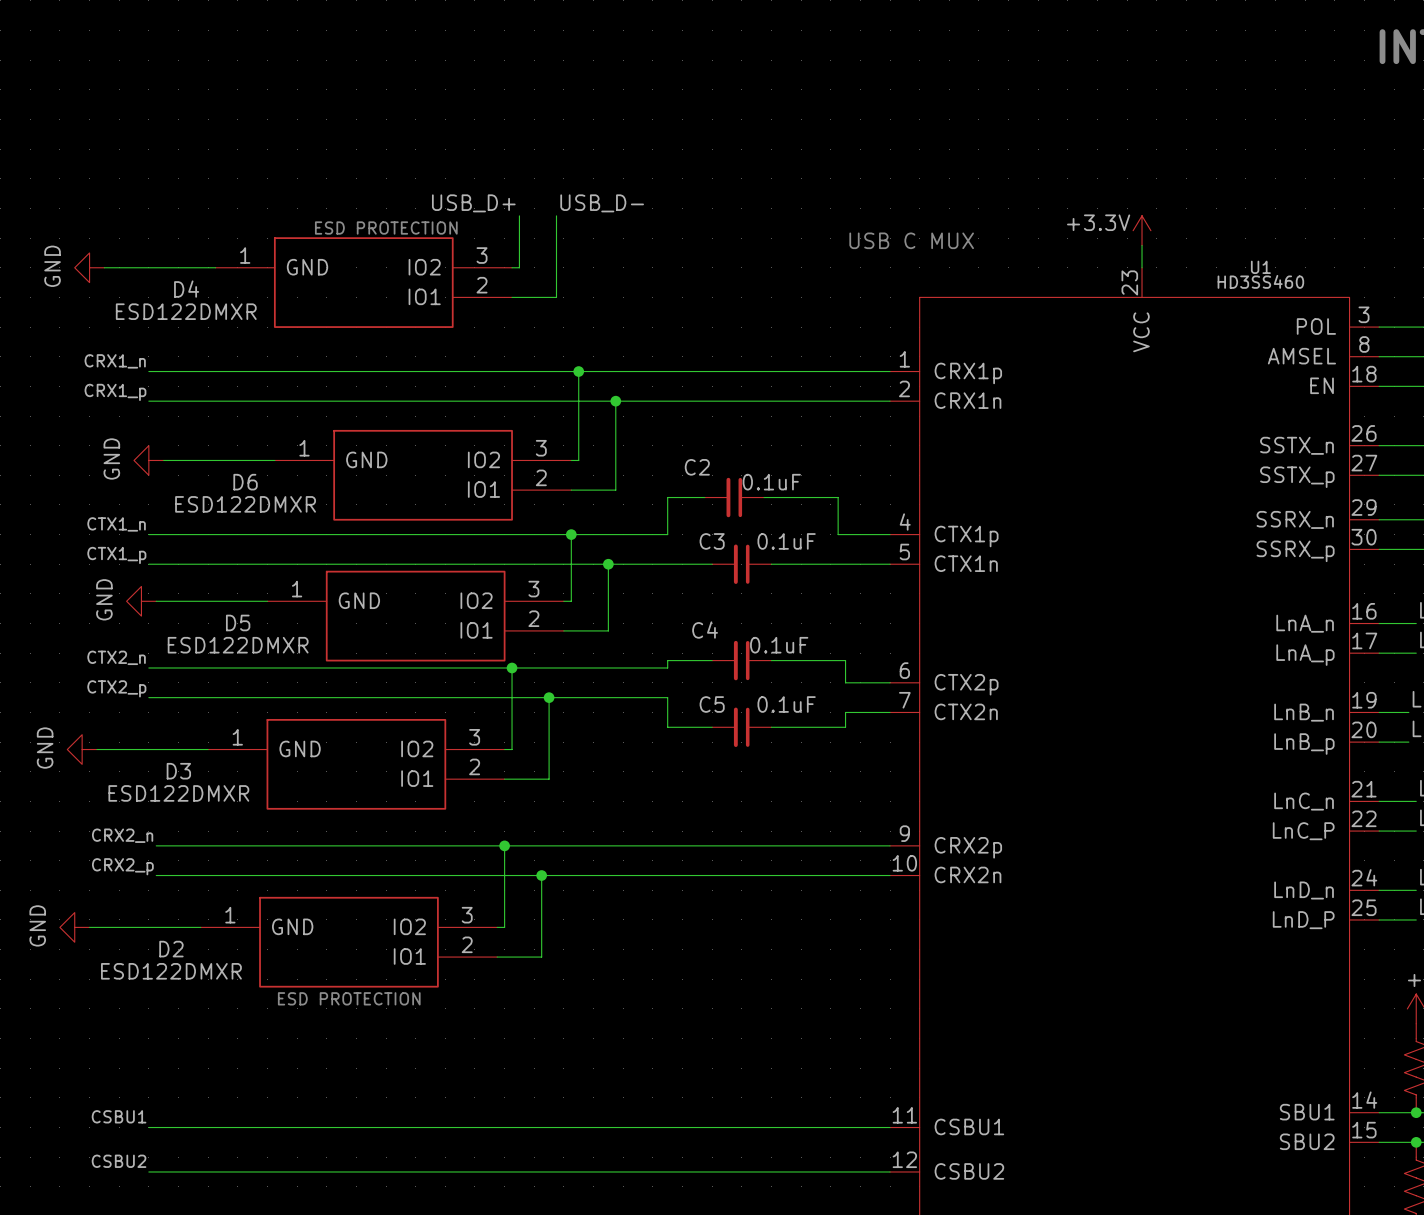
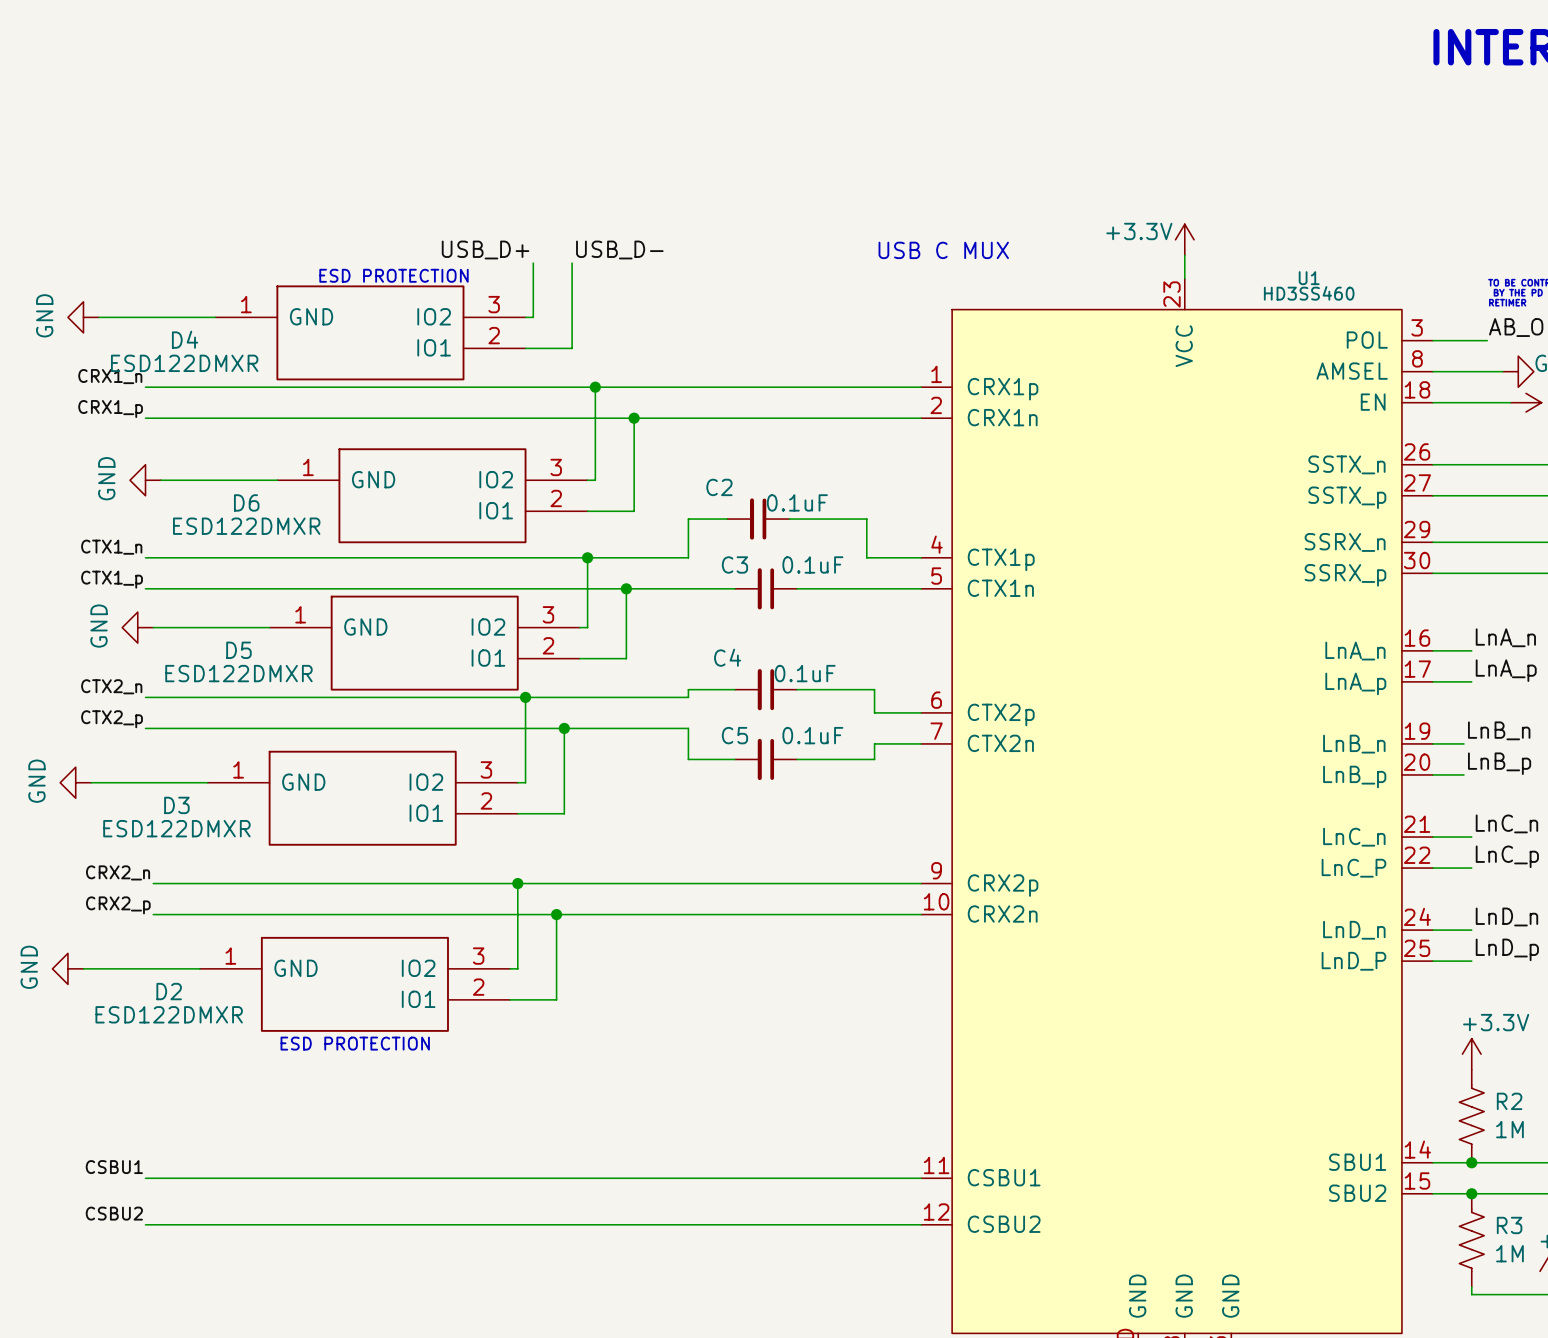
label position: USB_D+ (473, 203) -> USB_D+ (485, 249)
label position: USB_D- (602, 203) -> USB_D- (619, 249)
wire: (519, 215) (519, 252) -> none
wire: (556, 215) (556, 252) -> none
text position: ESD PROTECTION (386, 228) -> ESD PROTECTION (393, 275)
power symbol position: GND (89, 267) -> GND (83, 317)
wire: (104, 267) (215, 267) -> (98, 317) (215, 317)
wire: (512, 267) (519, 267) -> (525, 317) (533, 317) (533, 278)
D4 position: (363, 282) -> (370, 332)
wire: (512, 297) (556, 297) -> (525, 348) (572, 348) (572, 309)

